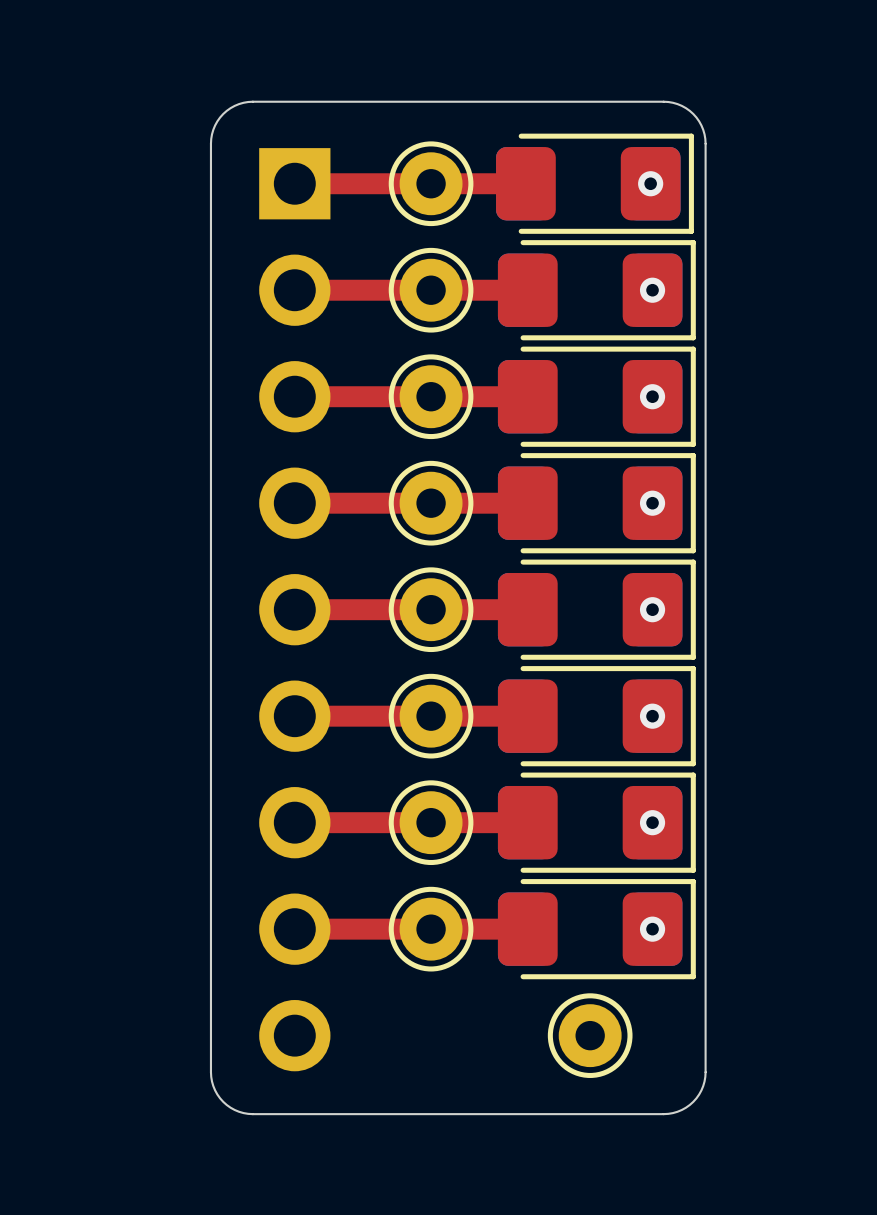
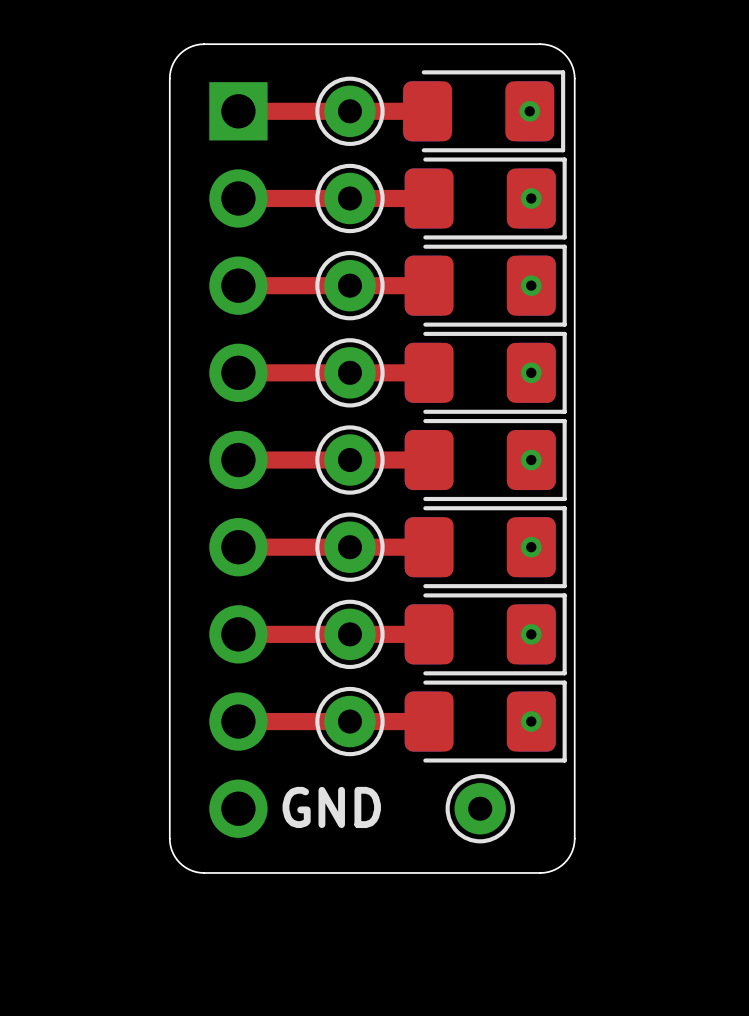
text: none -> GND (331, 807)

